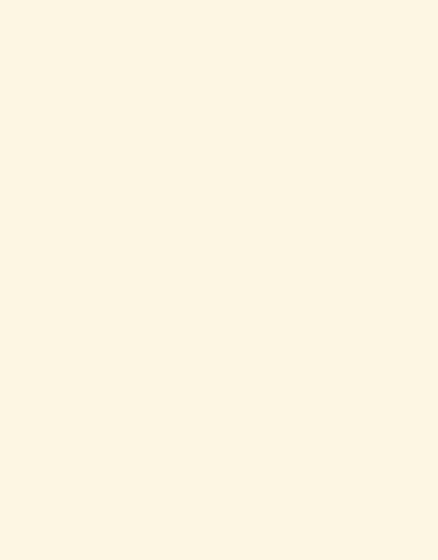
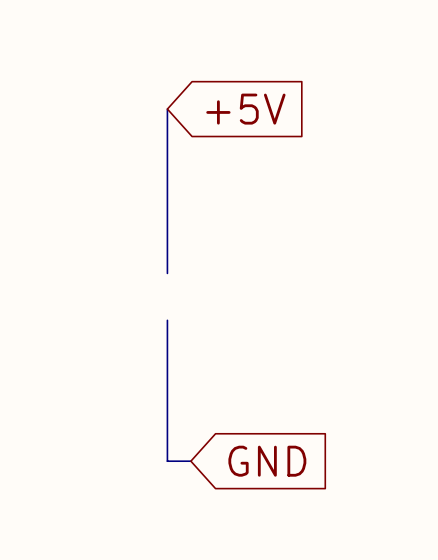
wire: none -> (167, 109) (167, 273)
global label: none -> +5V (245, 109)
wire: none -> (167, 320) (167, 461) (190, 461)
global label: none -> GND (267, 461)

